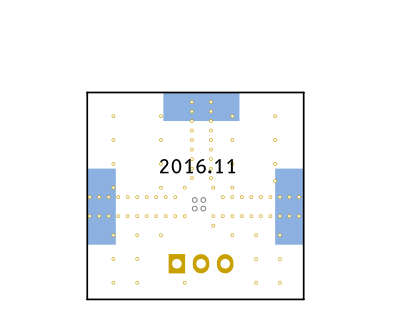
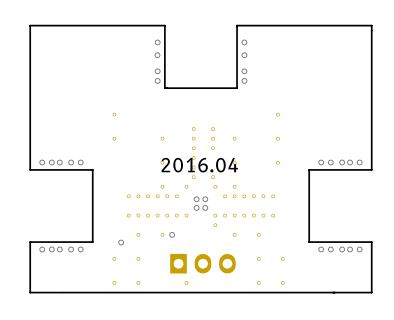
via: none -> (157, 42)
via: none -> (244, 42)
via: none -> (157, 55)
via: none -> (244, 55)
via: none -> (157, 71)
via: none -> (244, 71)
via: none -> (157, 80)
via: none -> (244, 80)
board edge: (303, 92) (303, 299) (87, 299) (87, 92) (303, 92) -> none
part: (191, 102) -> none
part: (210, 102) -> none
part: (201, 106) -> none
part: (191, 111) -> none
part: (210, 111) -> none
part: (160, 116) -> none
part: (232, 116) -> none
part: (191, 121) -> none
part: (210, 121) -> none
part: (210, 159) -> none
via: none -> (42, 162)
via: none -> (51, 162)
via: none -> (59, 162)
via: none -> (71, 162)
via: none -> (80, 162)
part: (113, 163) -> none
via: none -> (321, 162)
via: none -> (330, 162)
via: none -> (342, 162)
via: none -> (350, 162)
via: none -> (359, 162)
text: 2016.11 (197, 166) -> 2016.04 (199, 165)
part: (210, 168) -> none
part: (275, 180) -> none
part: (113, 187) -> none
part: (89, 197) -> none
part: (99, 197) -> none
part: (108, 197) -> none
part: (118, 197) -> none
part: (279, 197) -> none
part: (289, 197) -> none
part: (298, 197) -> none
part: (101, 206) -> none
part: (289, 206) -> none
part: (89, 216) -> none
part: (99, 216) -> none
part: (108, 216) -> none
part: (118, 216) -> none
part: (279, 216) -> none
part: (289, 216) -> none
part: (298, 216) -> none
part: (113, 235) -> none
via: none -> (172, 234)
part: (279, 235) -> none
via: none -> (121, 242)
via: none -> (42, 249)
via: none -> (51, 249)
via: none -> (59, 249)
via: none -> (71, 249)
via: none -> (80, 249)
via: none -> (321, 249)
via: none -> (330, 249)
via: none -> (342, 249)
via: none -> (350, 249)
via: none -> (359, 249)
board edge: none -> (57, 292) (371, 292) (371, 242) (309, 242) (309, 169) (371, 169) (371, 25) (237, 25) (237, 88) (164, 88) (164, 25) (30, 25) (30, 169) (92, 169) (92, 242) (30, 242) (30, 292) (56, 292)

